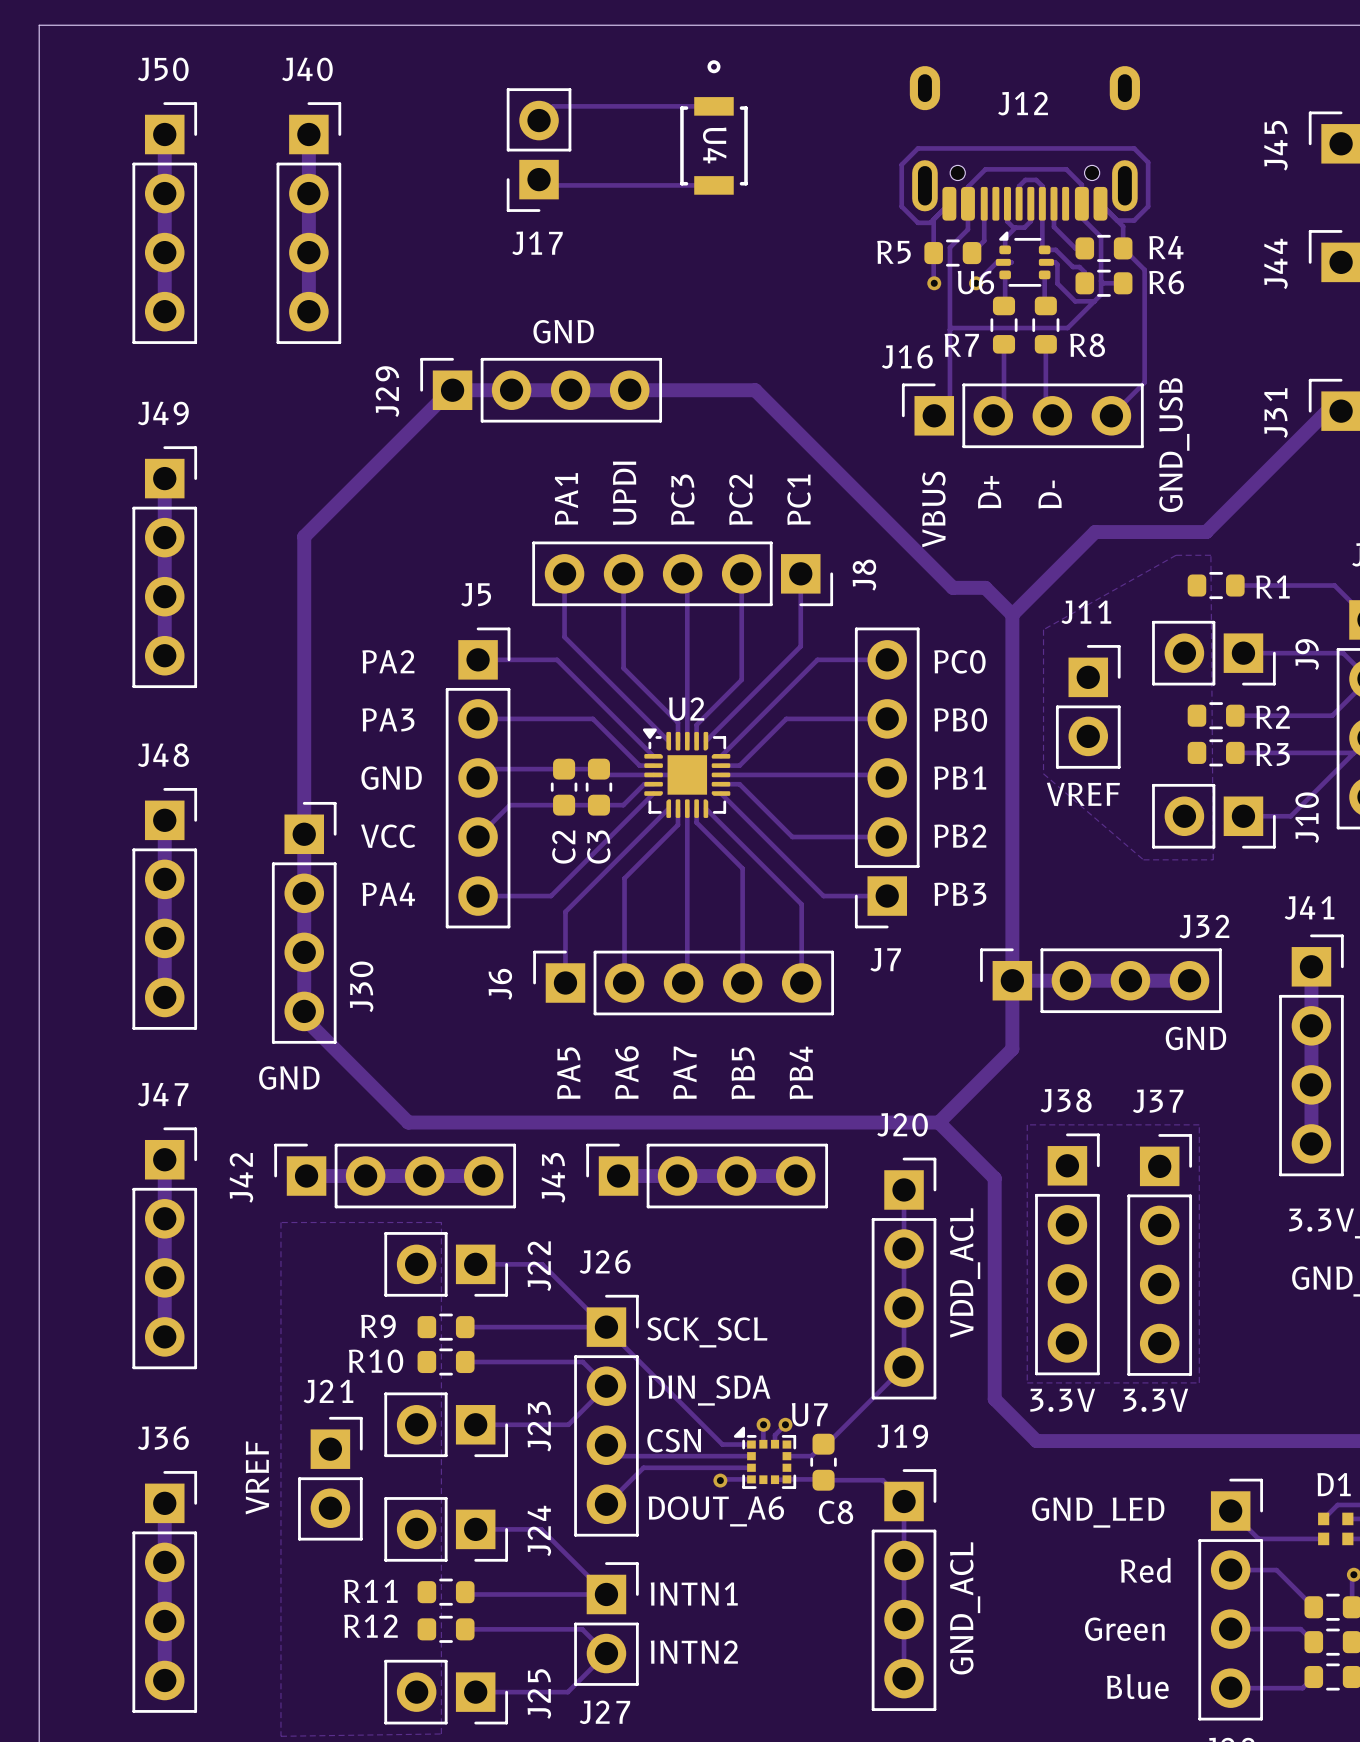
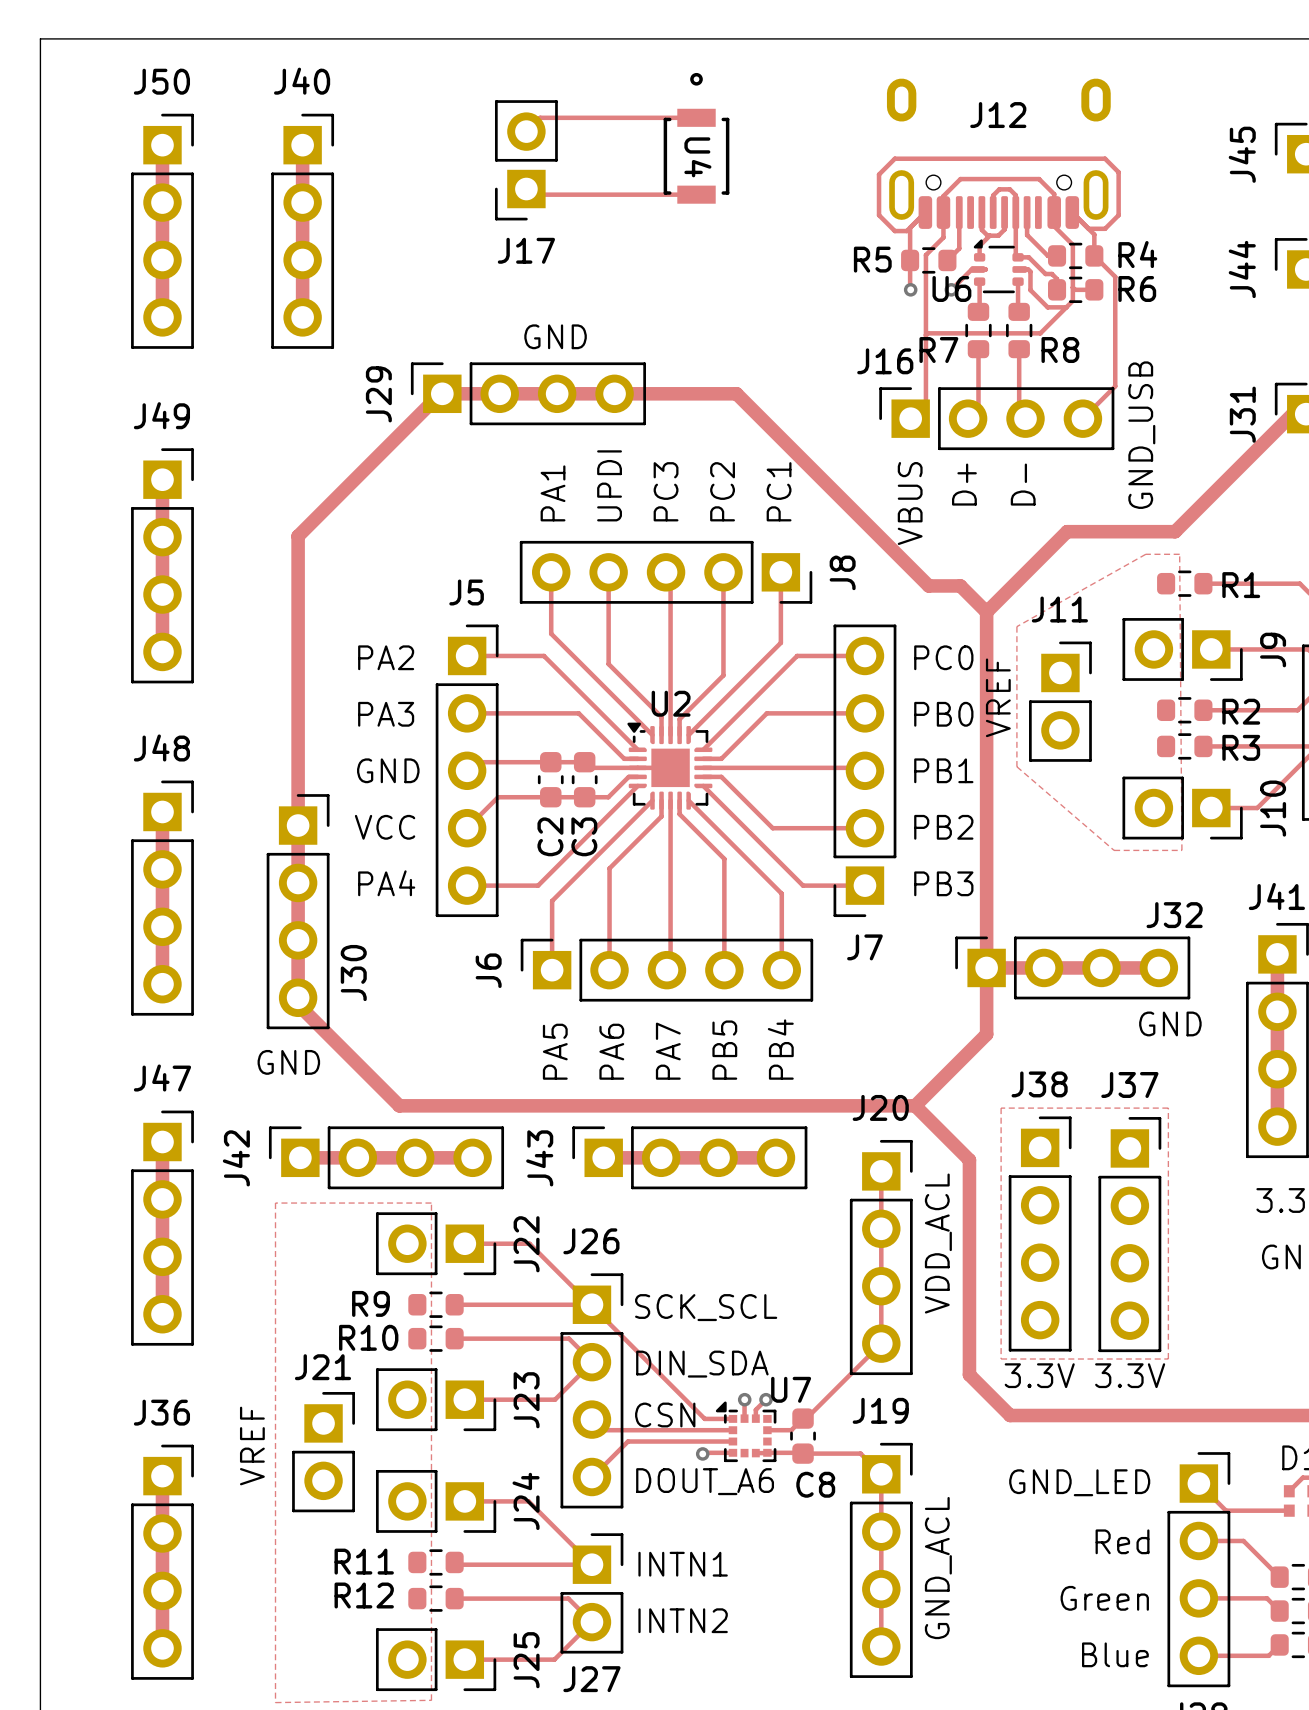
text rotation: 0° (1083, 794) -> 90° counterclockwise (998, 697)
text position: VREF (1083, 794) -> VREF (998, 697)

